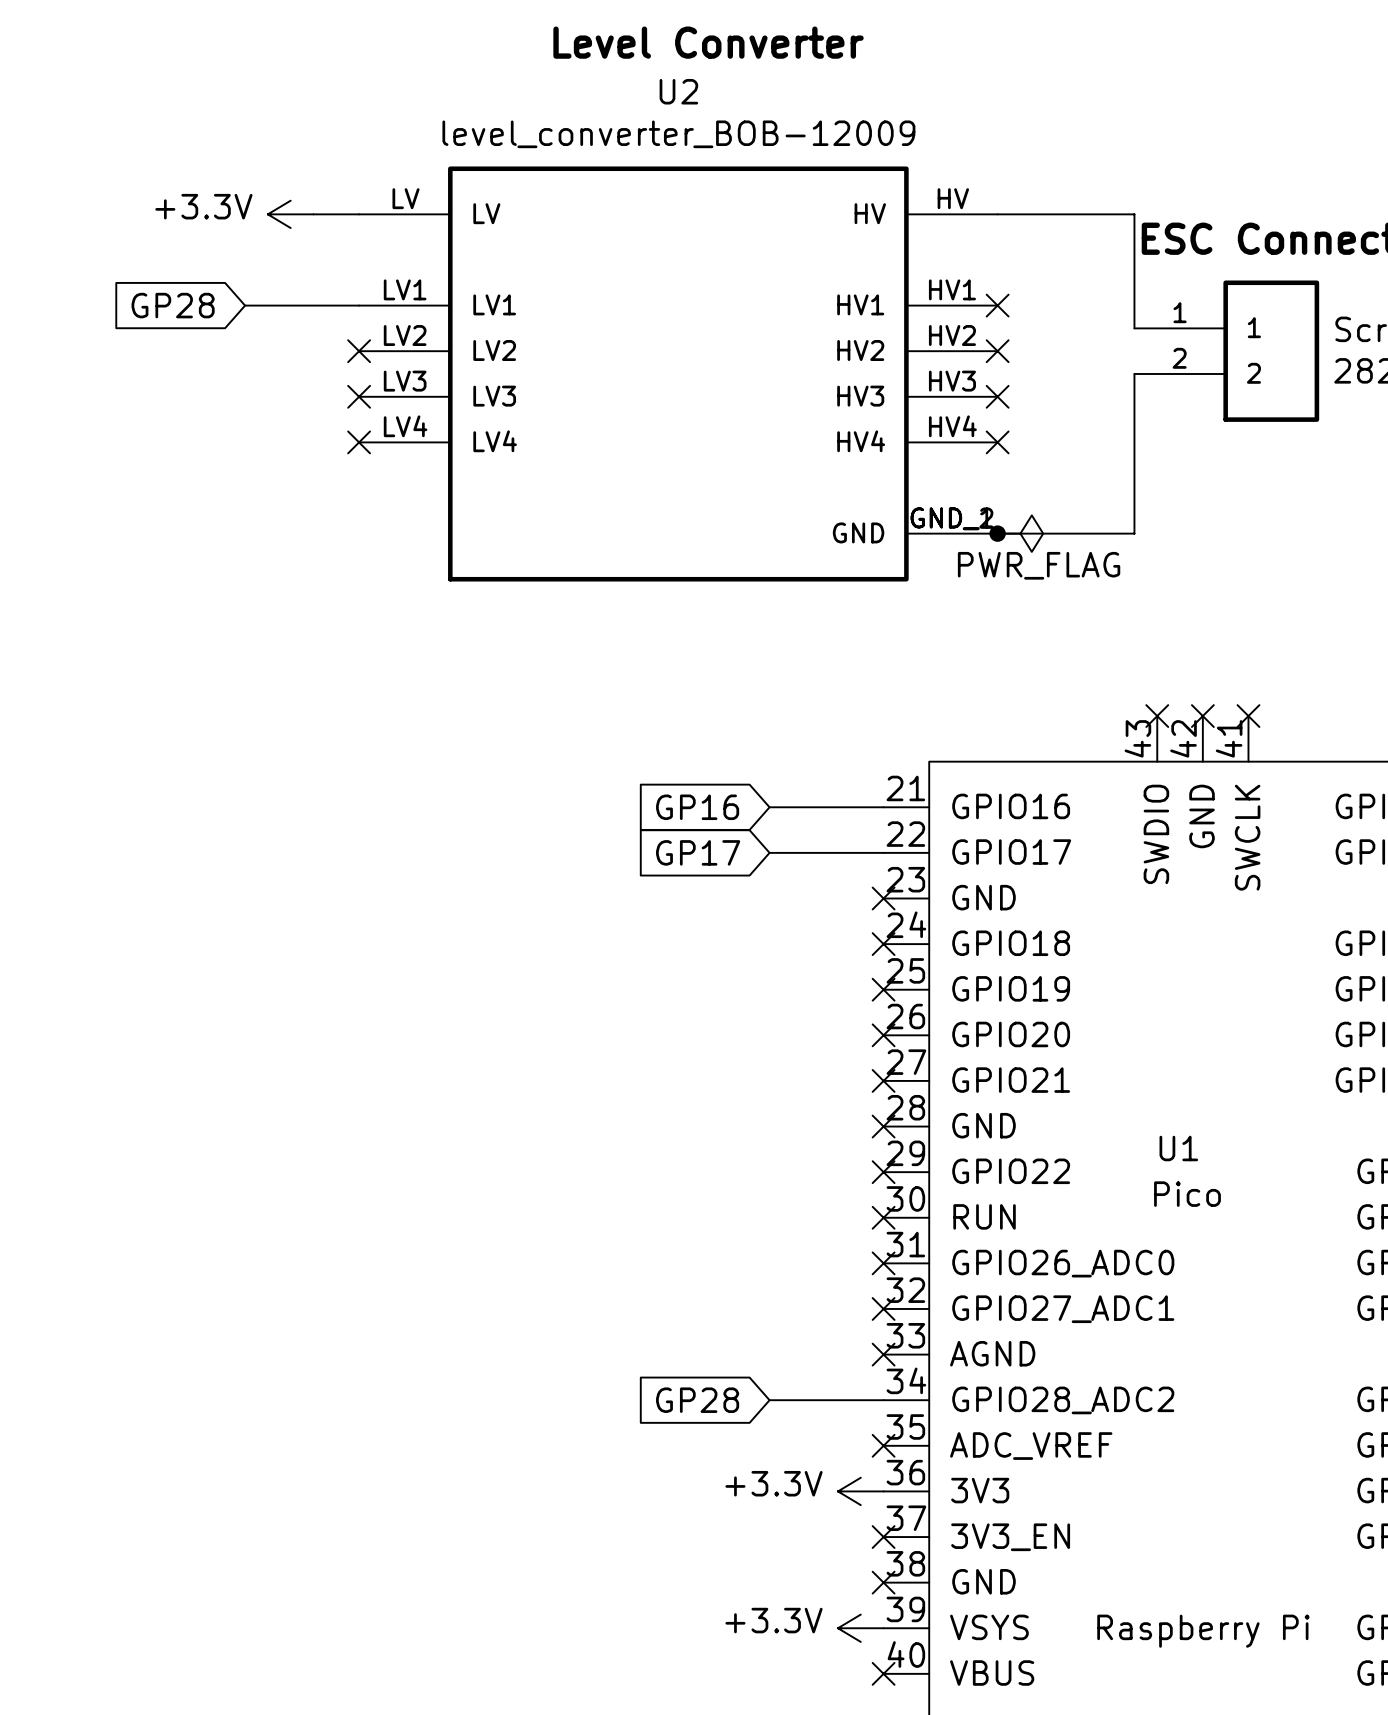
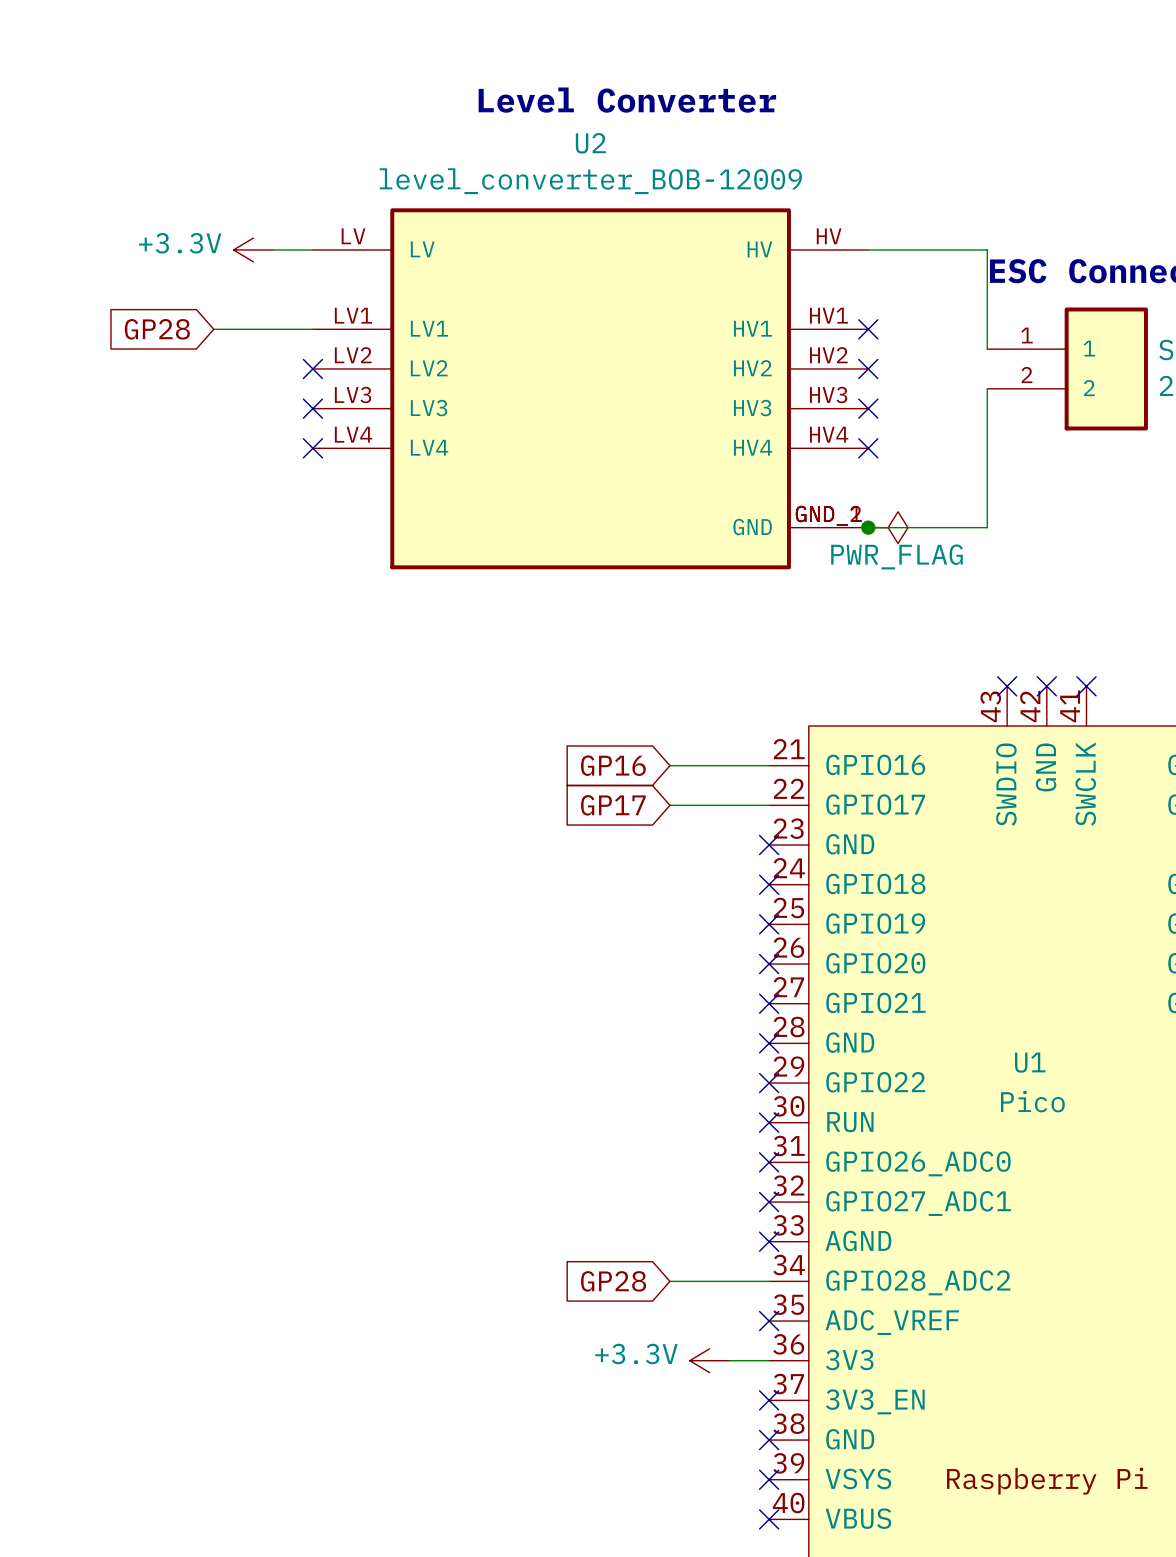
power symbol position: +3.3V (860, 1491) -> +3.3V (709, 1360)
power symbol: +3.3V (860, 1628) -> none
no-connect mark: none -> (769, 1479)

